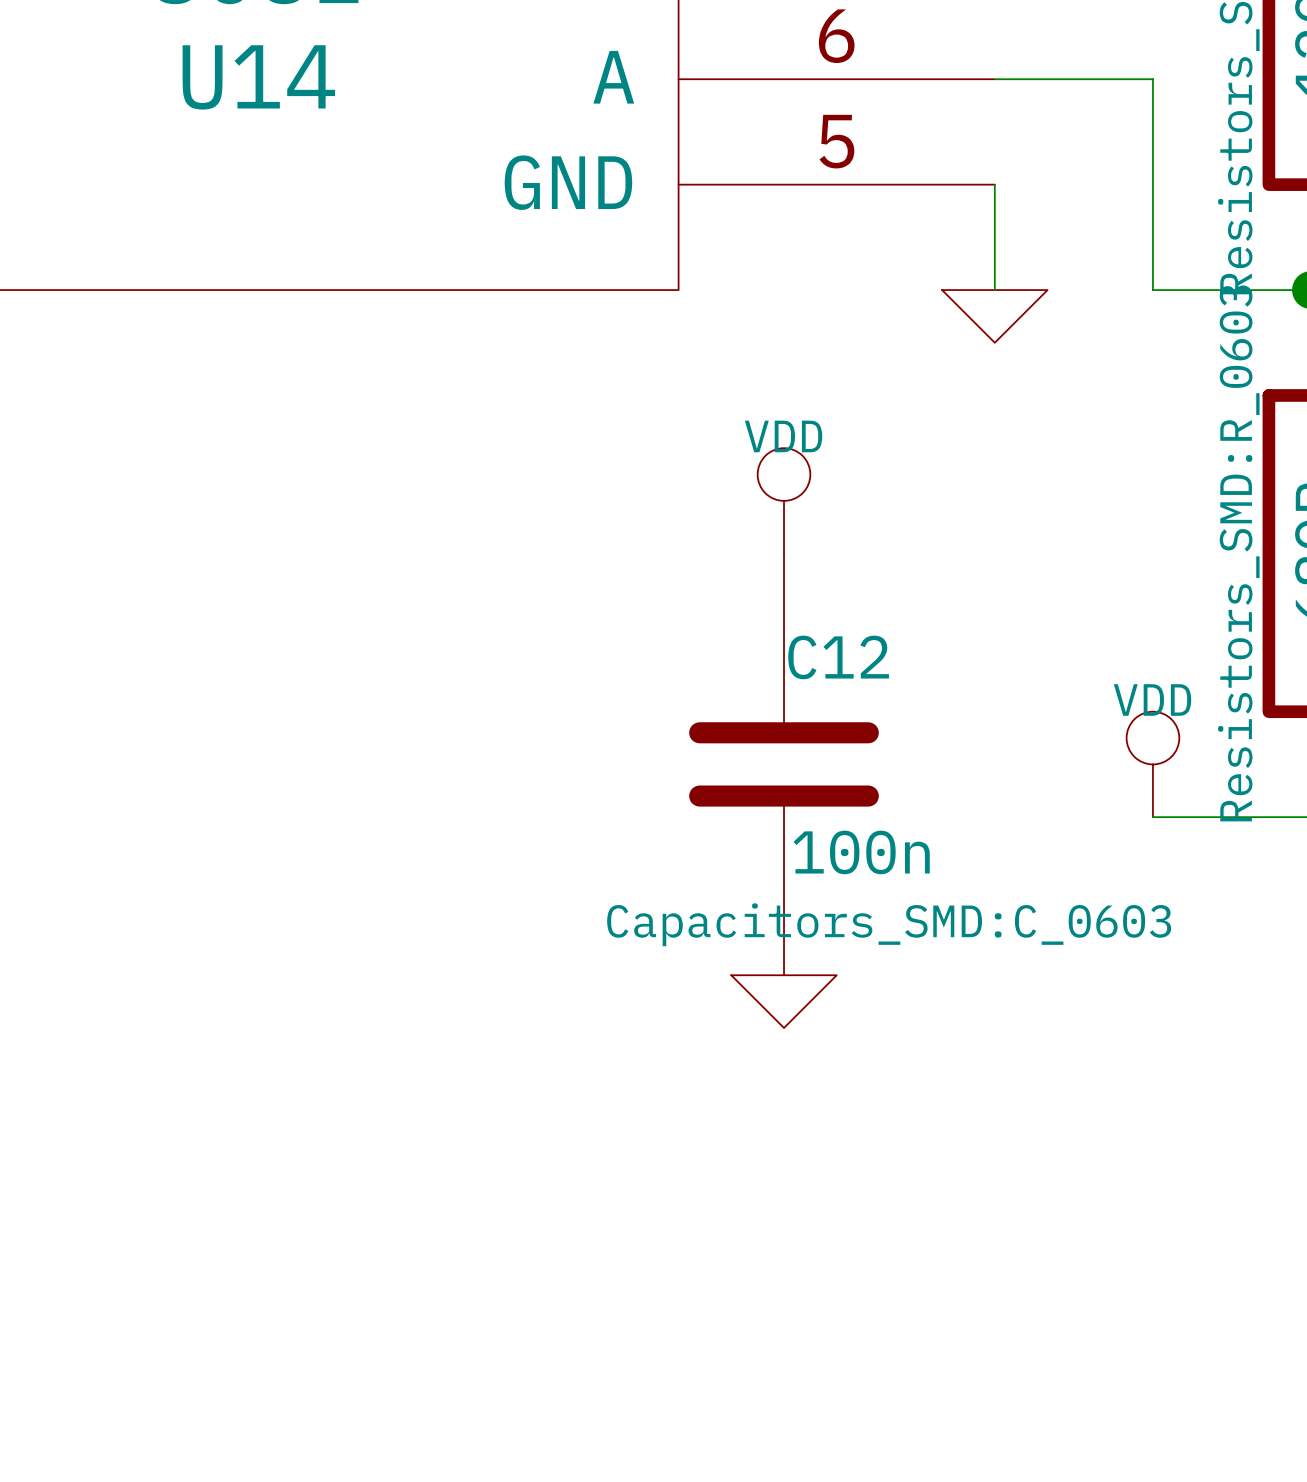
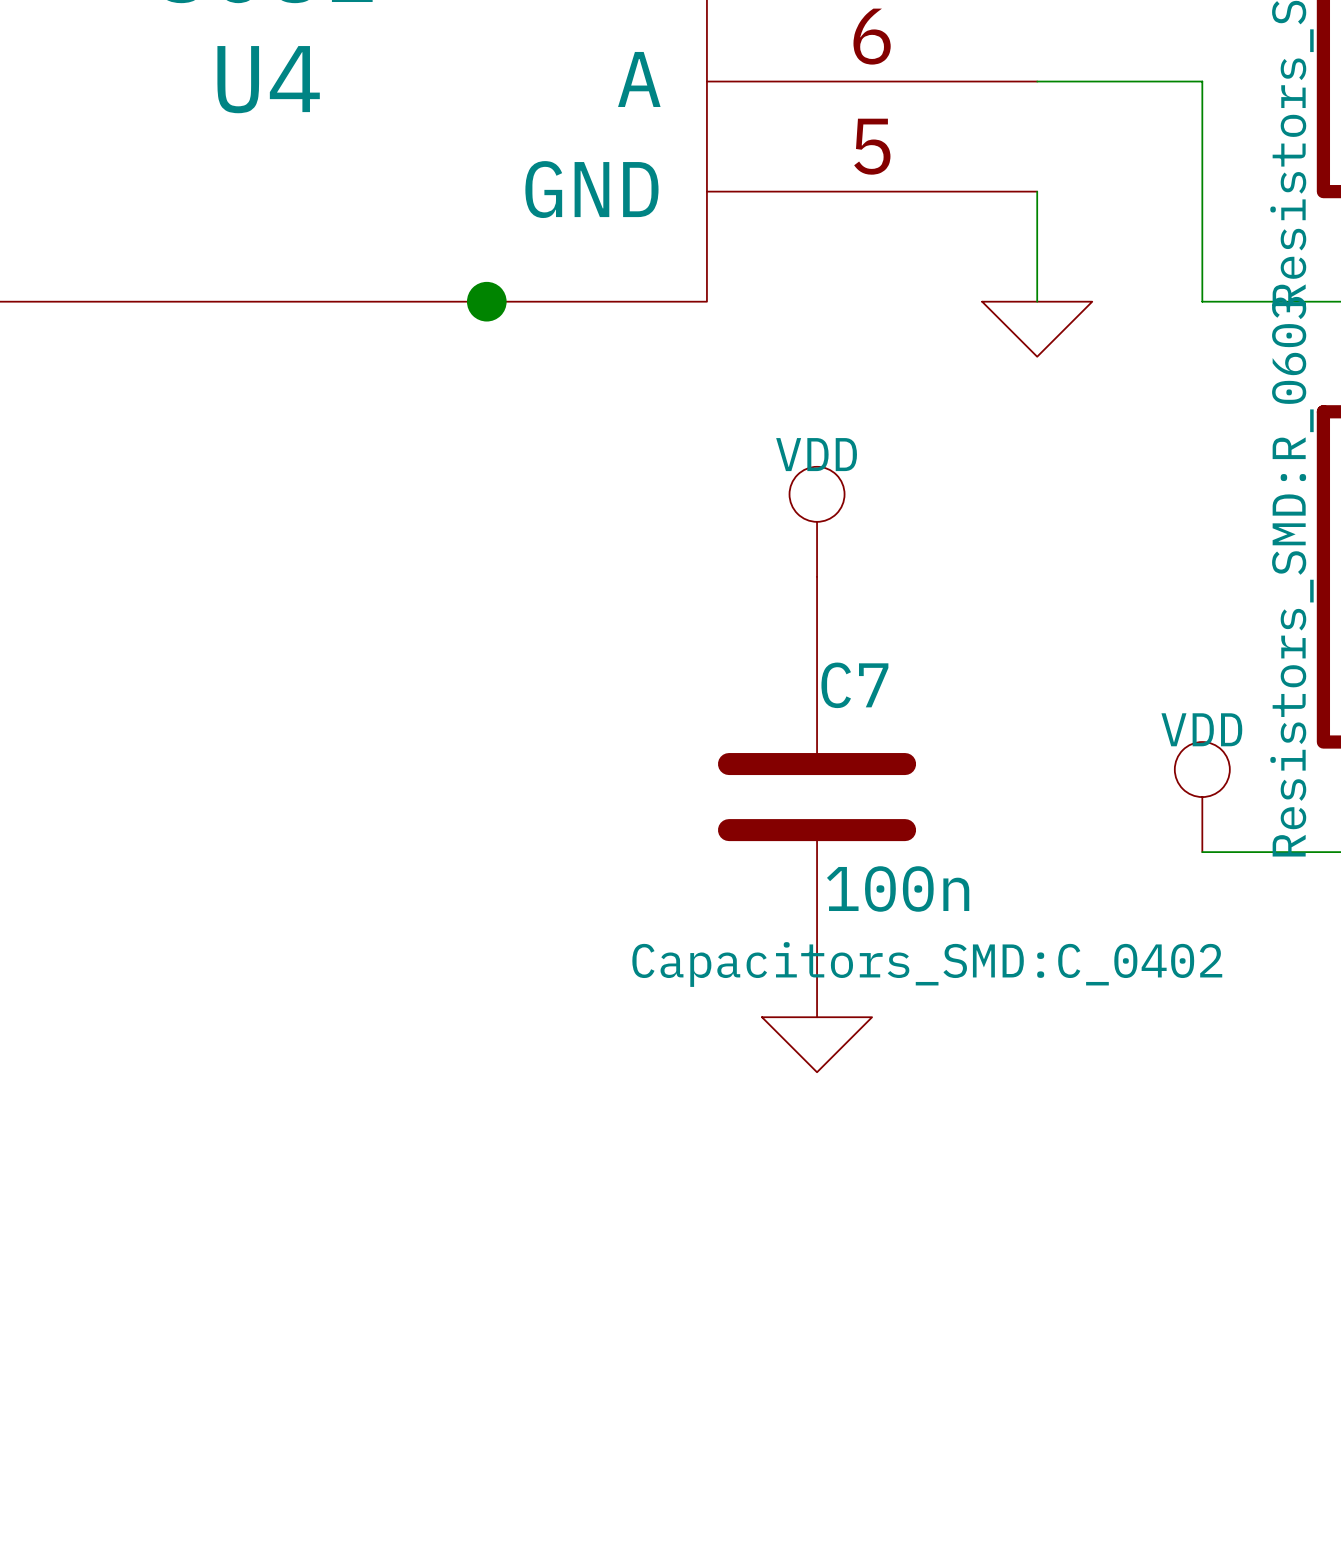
U14 name: U14 (258, 77) -> U4 (268, 79)
junction: none -> (486, 301)
C12 name: C12 (838, 657) -> C7 (854, 685)
C12 text: Capacitors_SMD:C_0603 (889, 924) -> Capacitors_SMD:C_0402 (927, 964)

